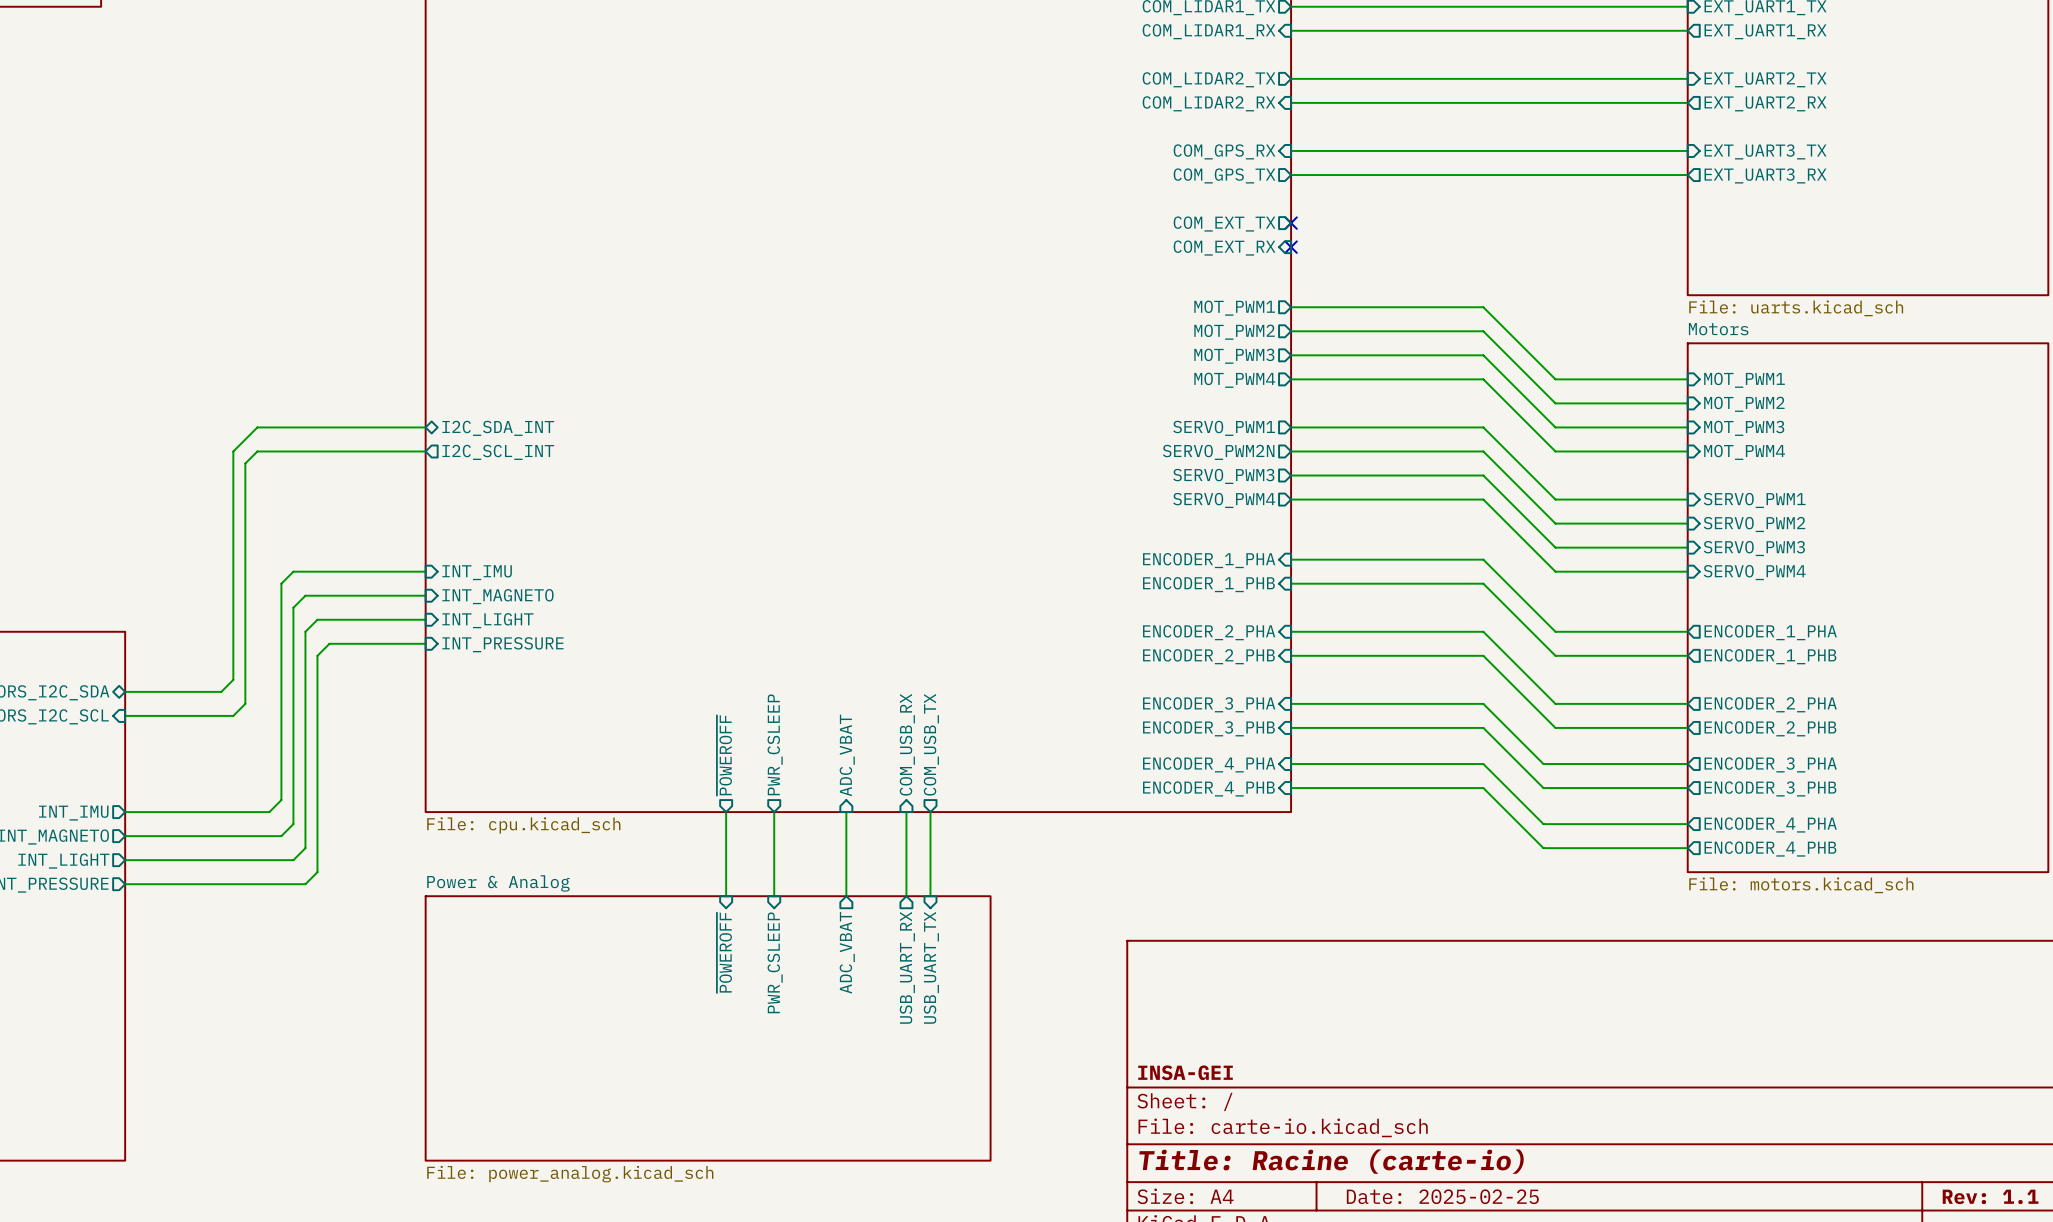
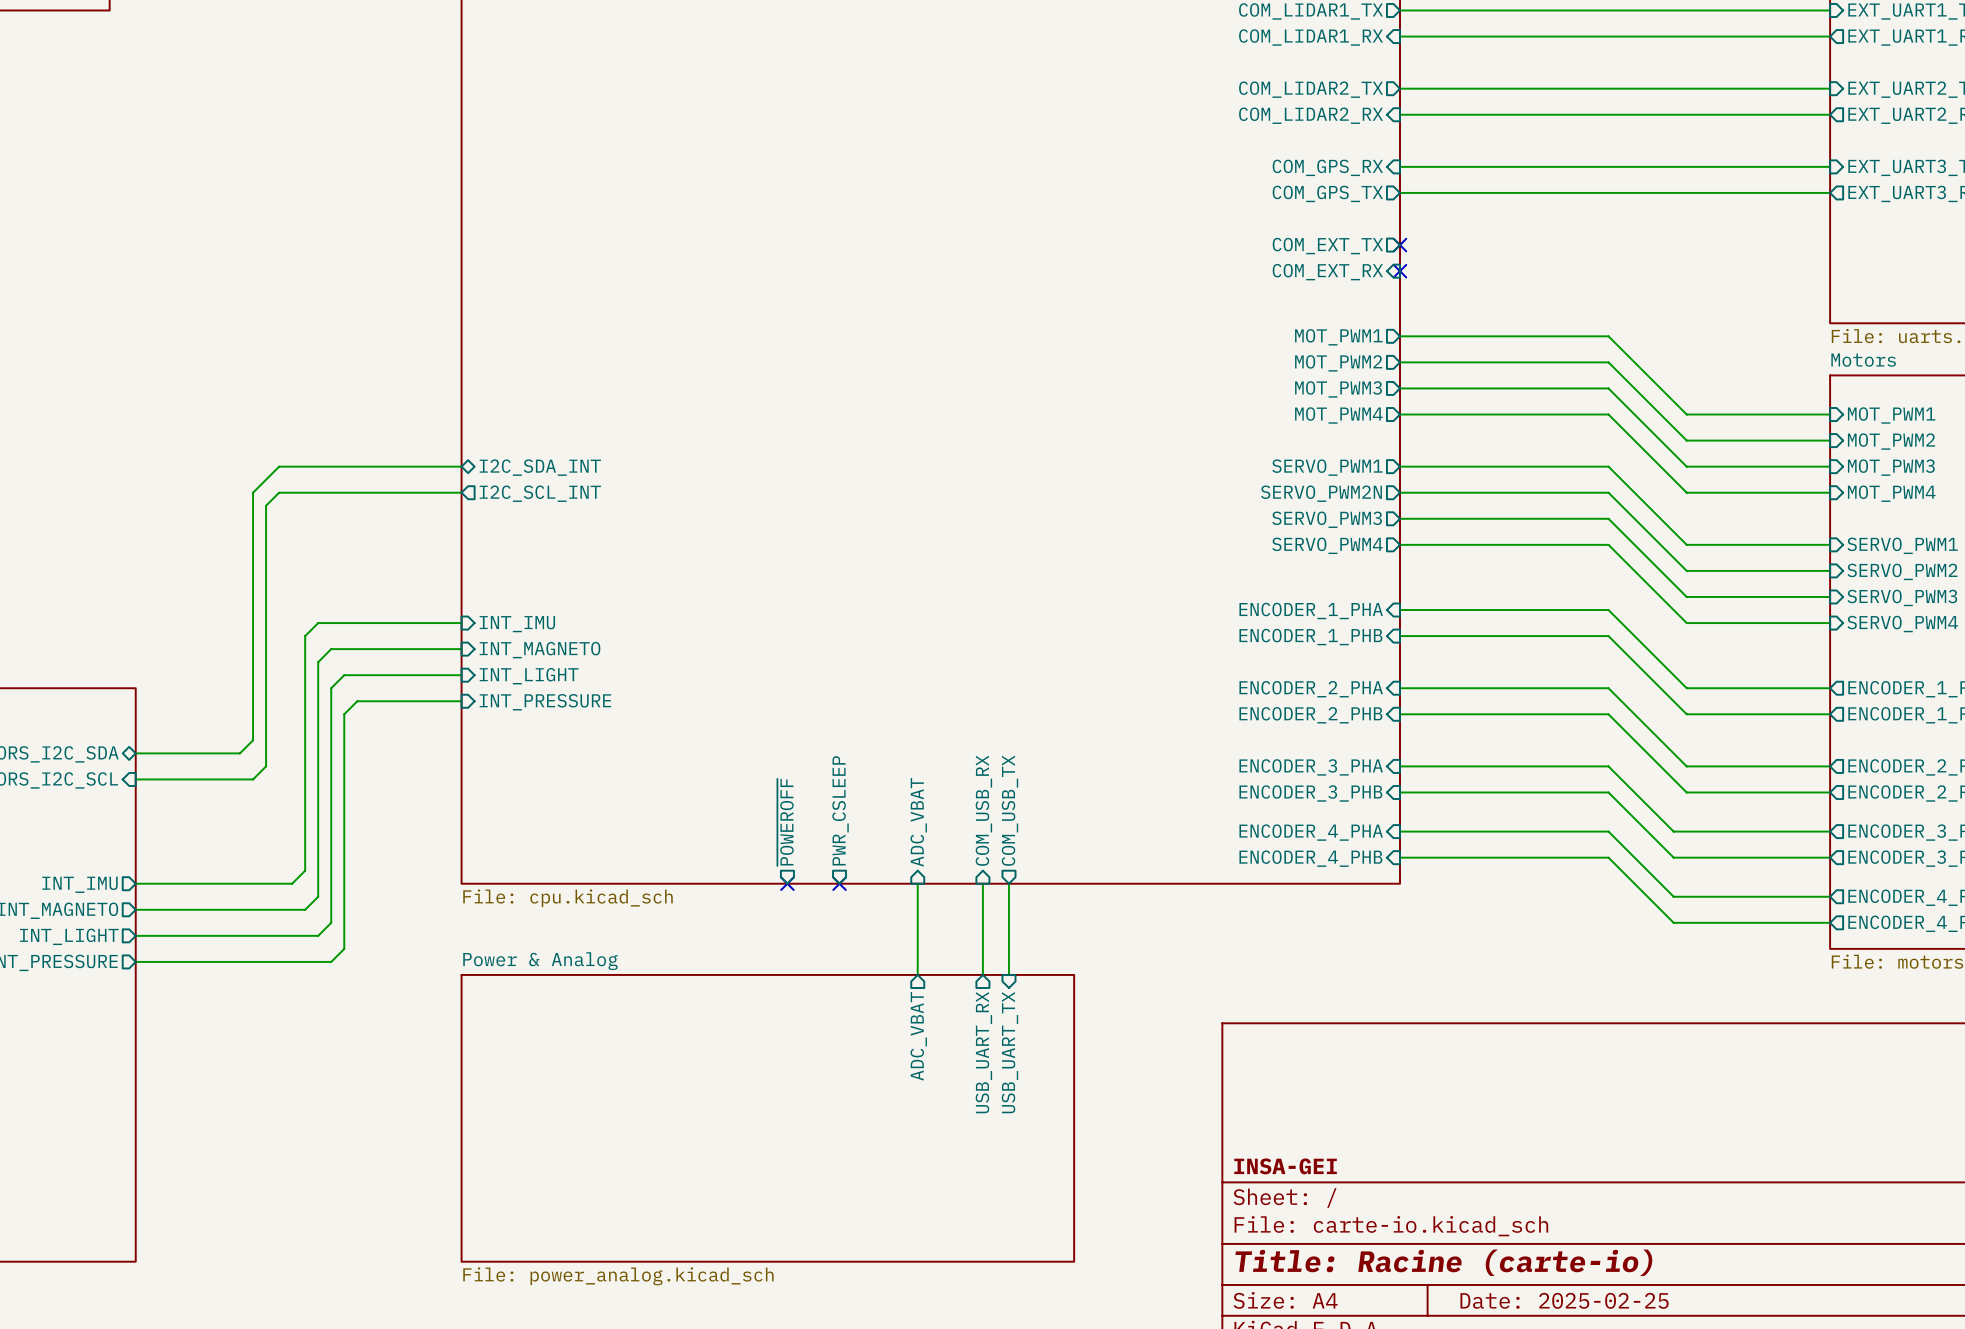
wire: (726, 812) (726, 896) -> none
no-connect mark: none -> (787, 883)
wire: (774, 812) (774, 896) -> none
no-connect mark: none -> (839, 883)
sheet pin: ~{POWEROFF} (724, 952) -> none
sheet pin: PWR_CSLEEP (775, 962) -> none

